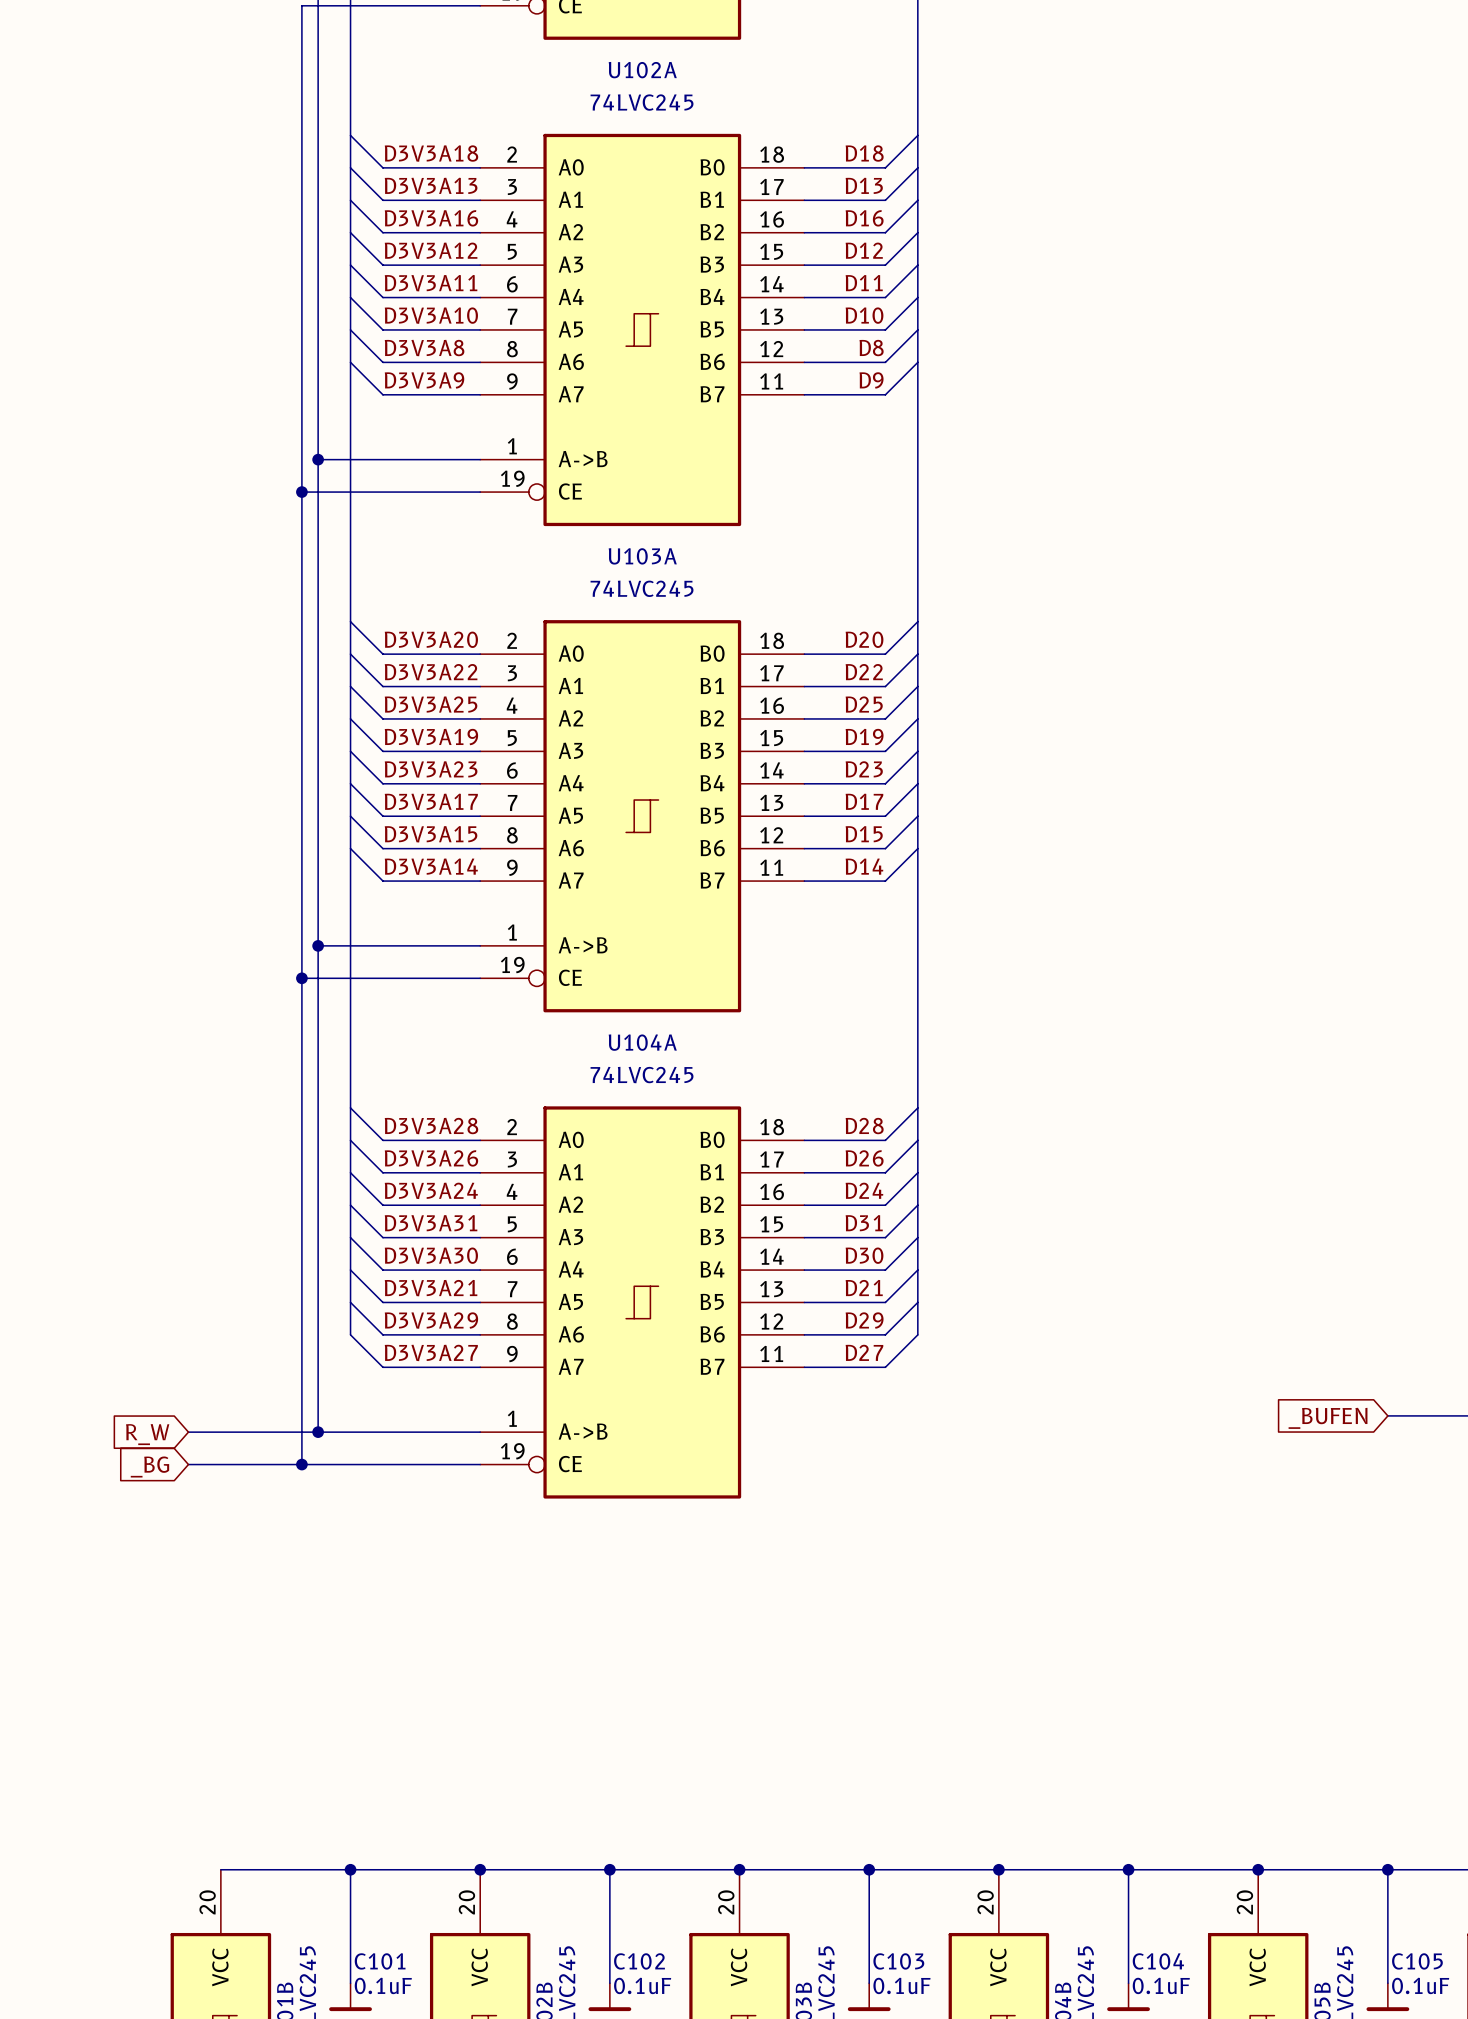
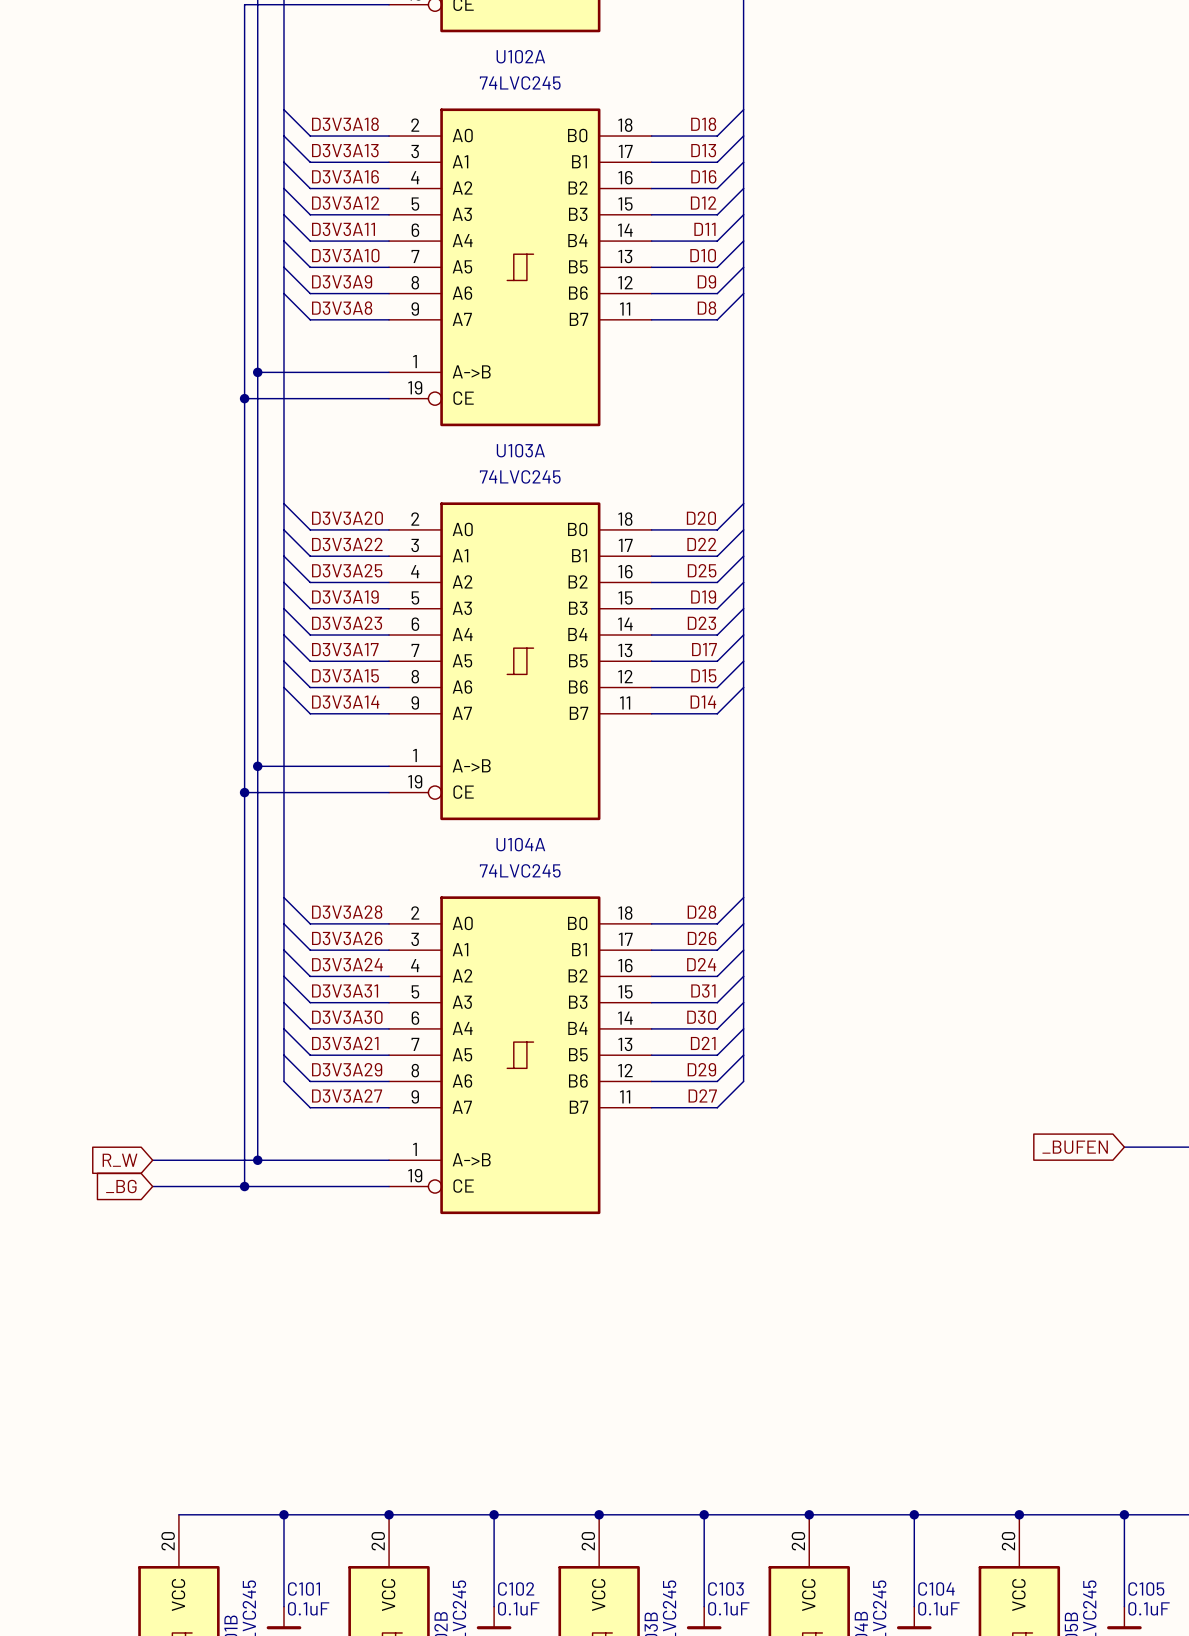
label: D3V3A8 (424, 348) -> D3V3A9 (342, 281)
label: D8 (871, 348) -> D9 (706, 281)
label: D3V3A9 (424, 380) -> D3V3A8 (342, 308)
label: D9 (871, 380) -> D8 (706, 308)

